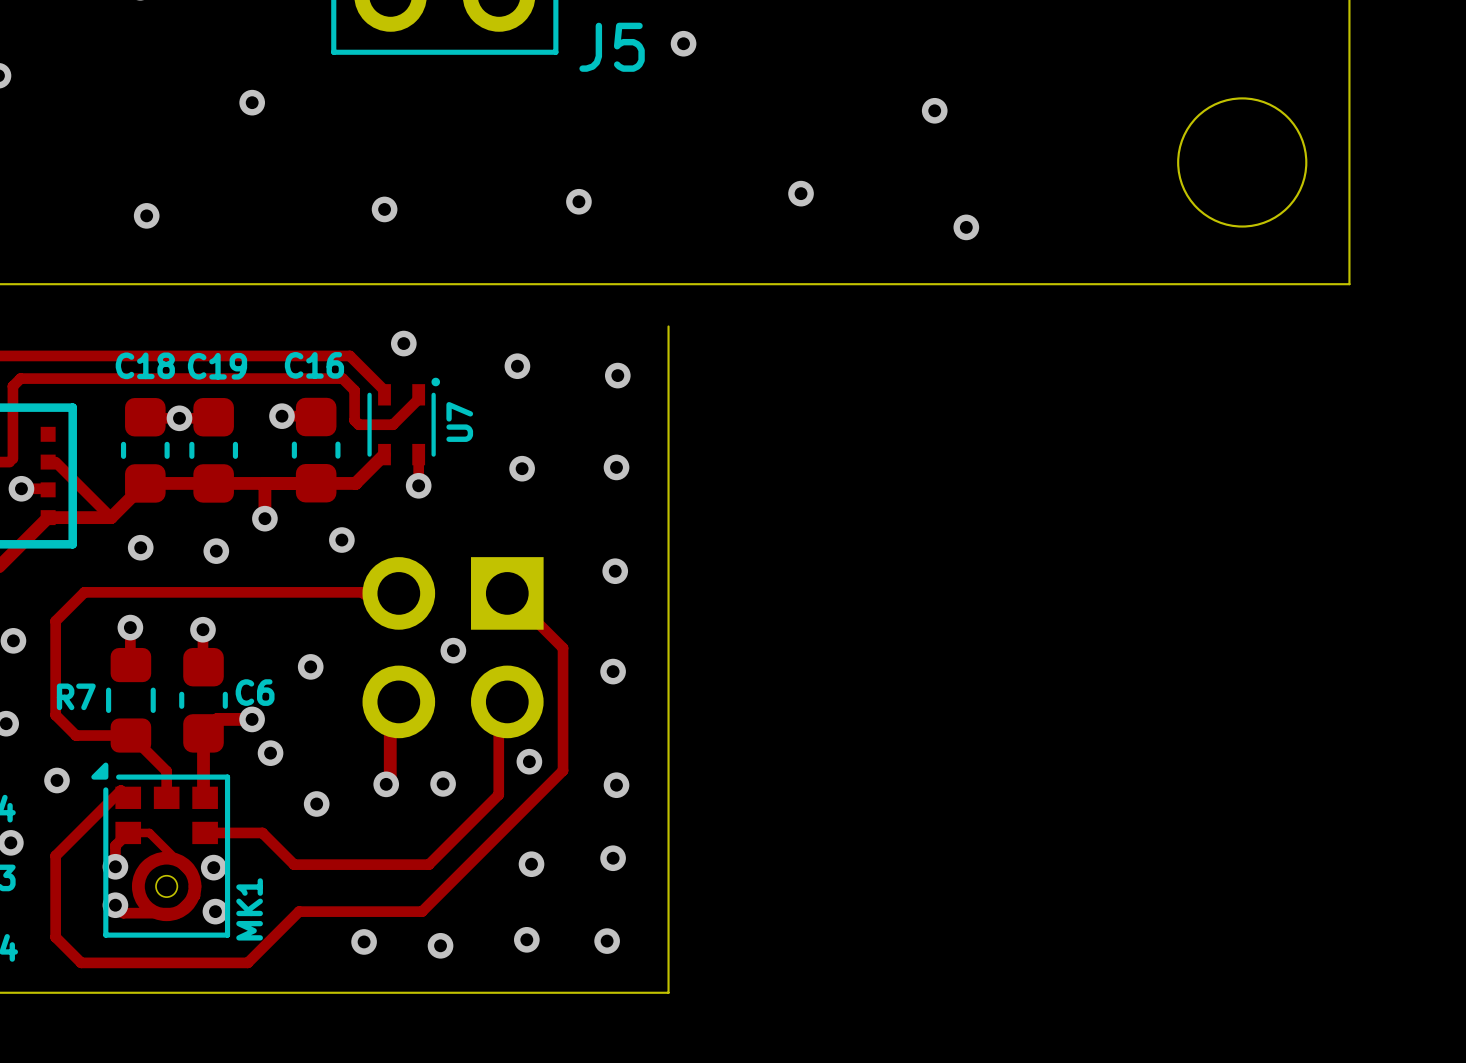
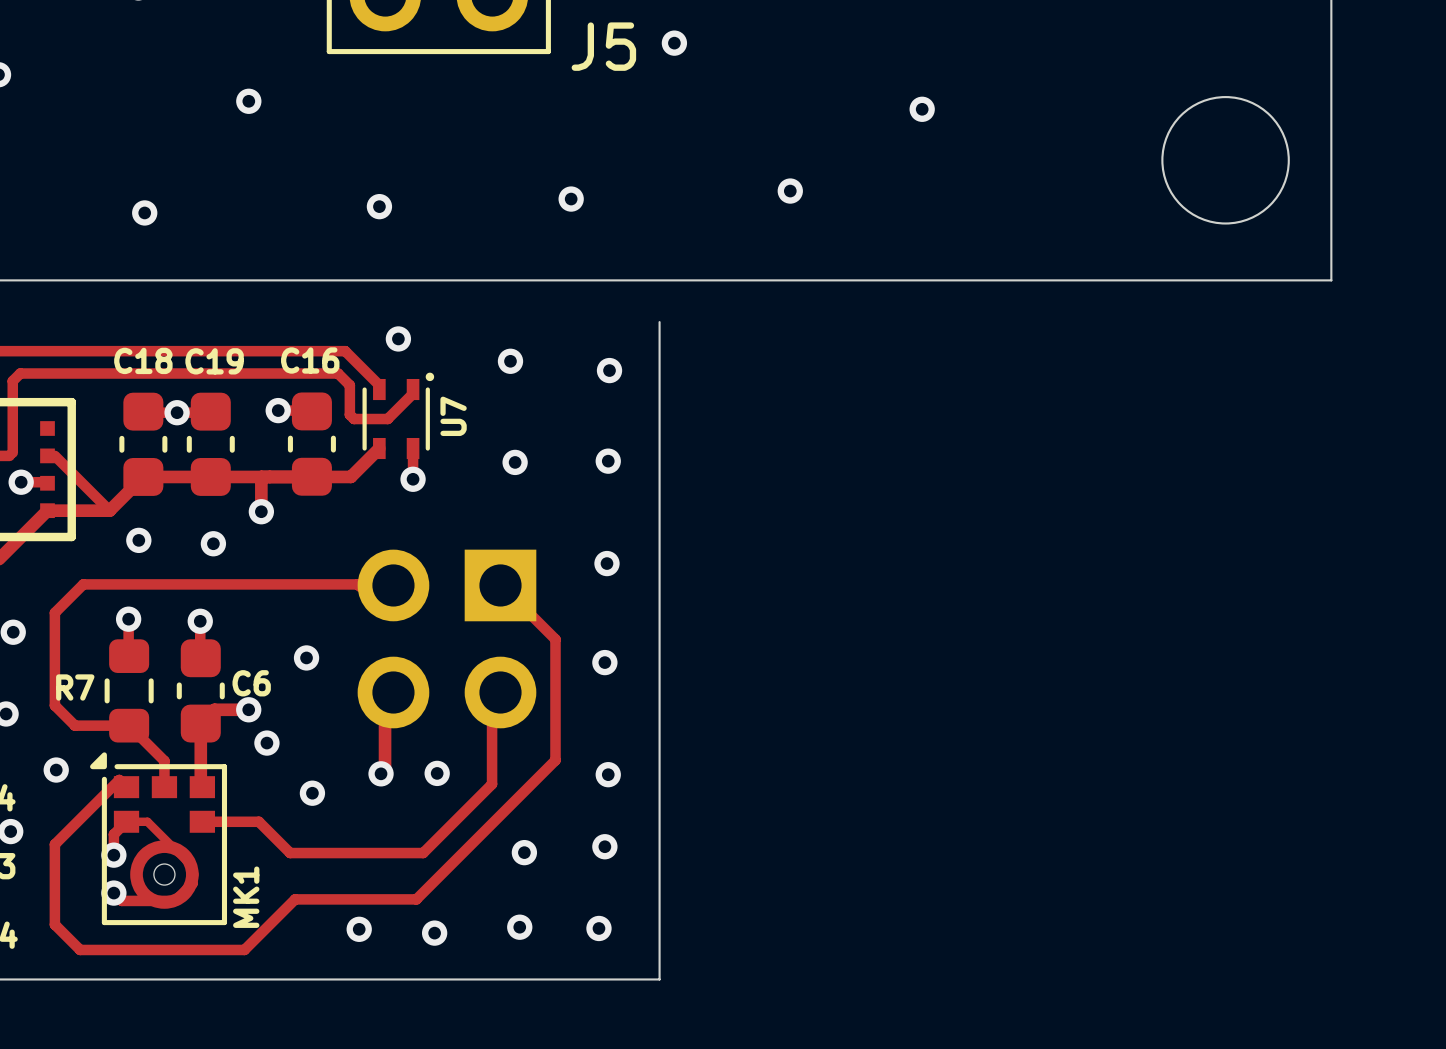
via: (966, 227) -> none
via: (341, 540) -> none
via: (453, 650) -> none
via: (529, 761) -> none
via: (213, 867) -> none
via: (215, 911) -> none

